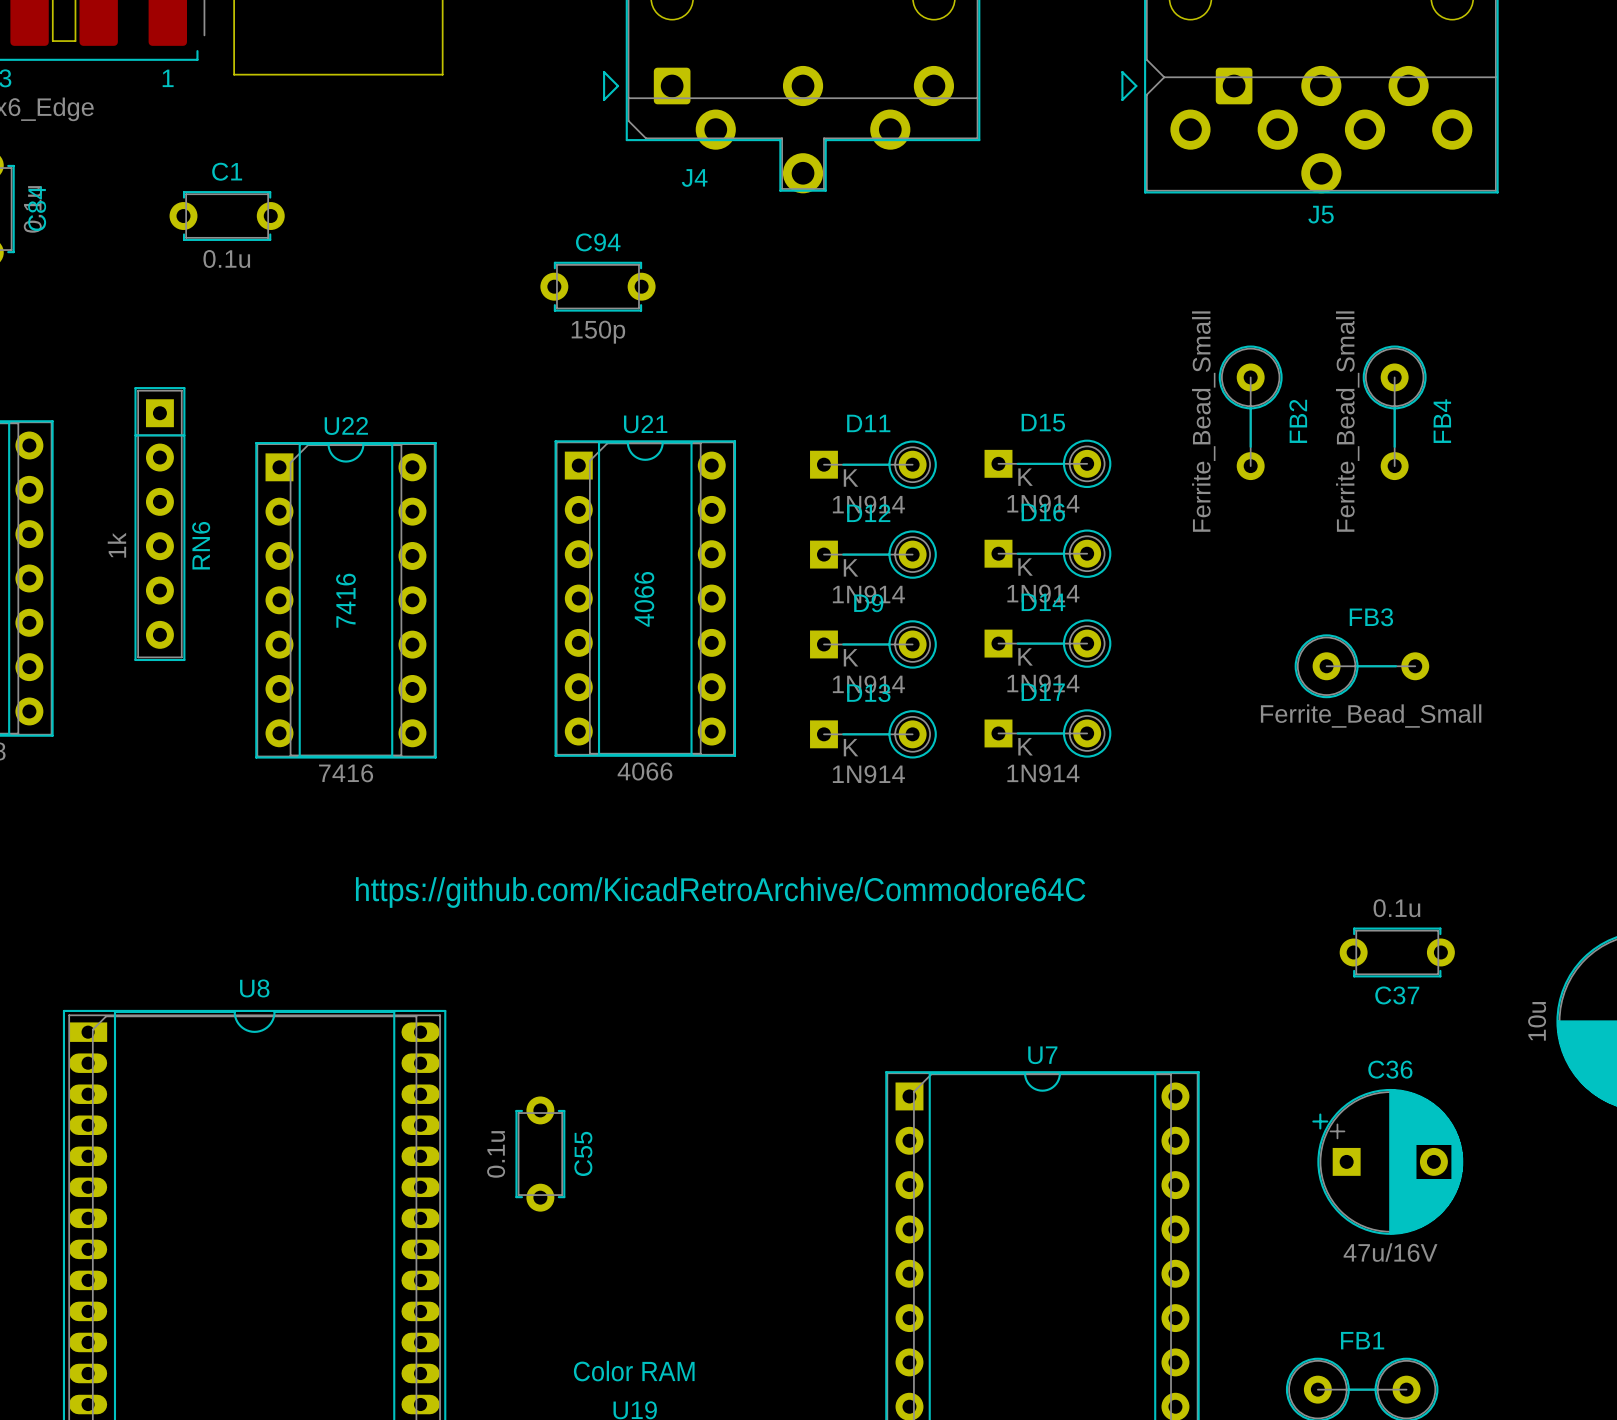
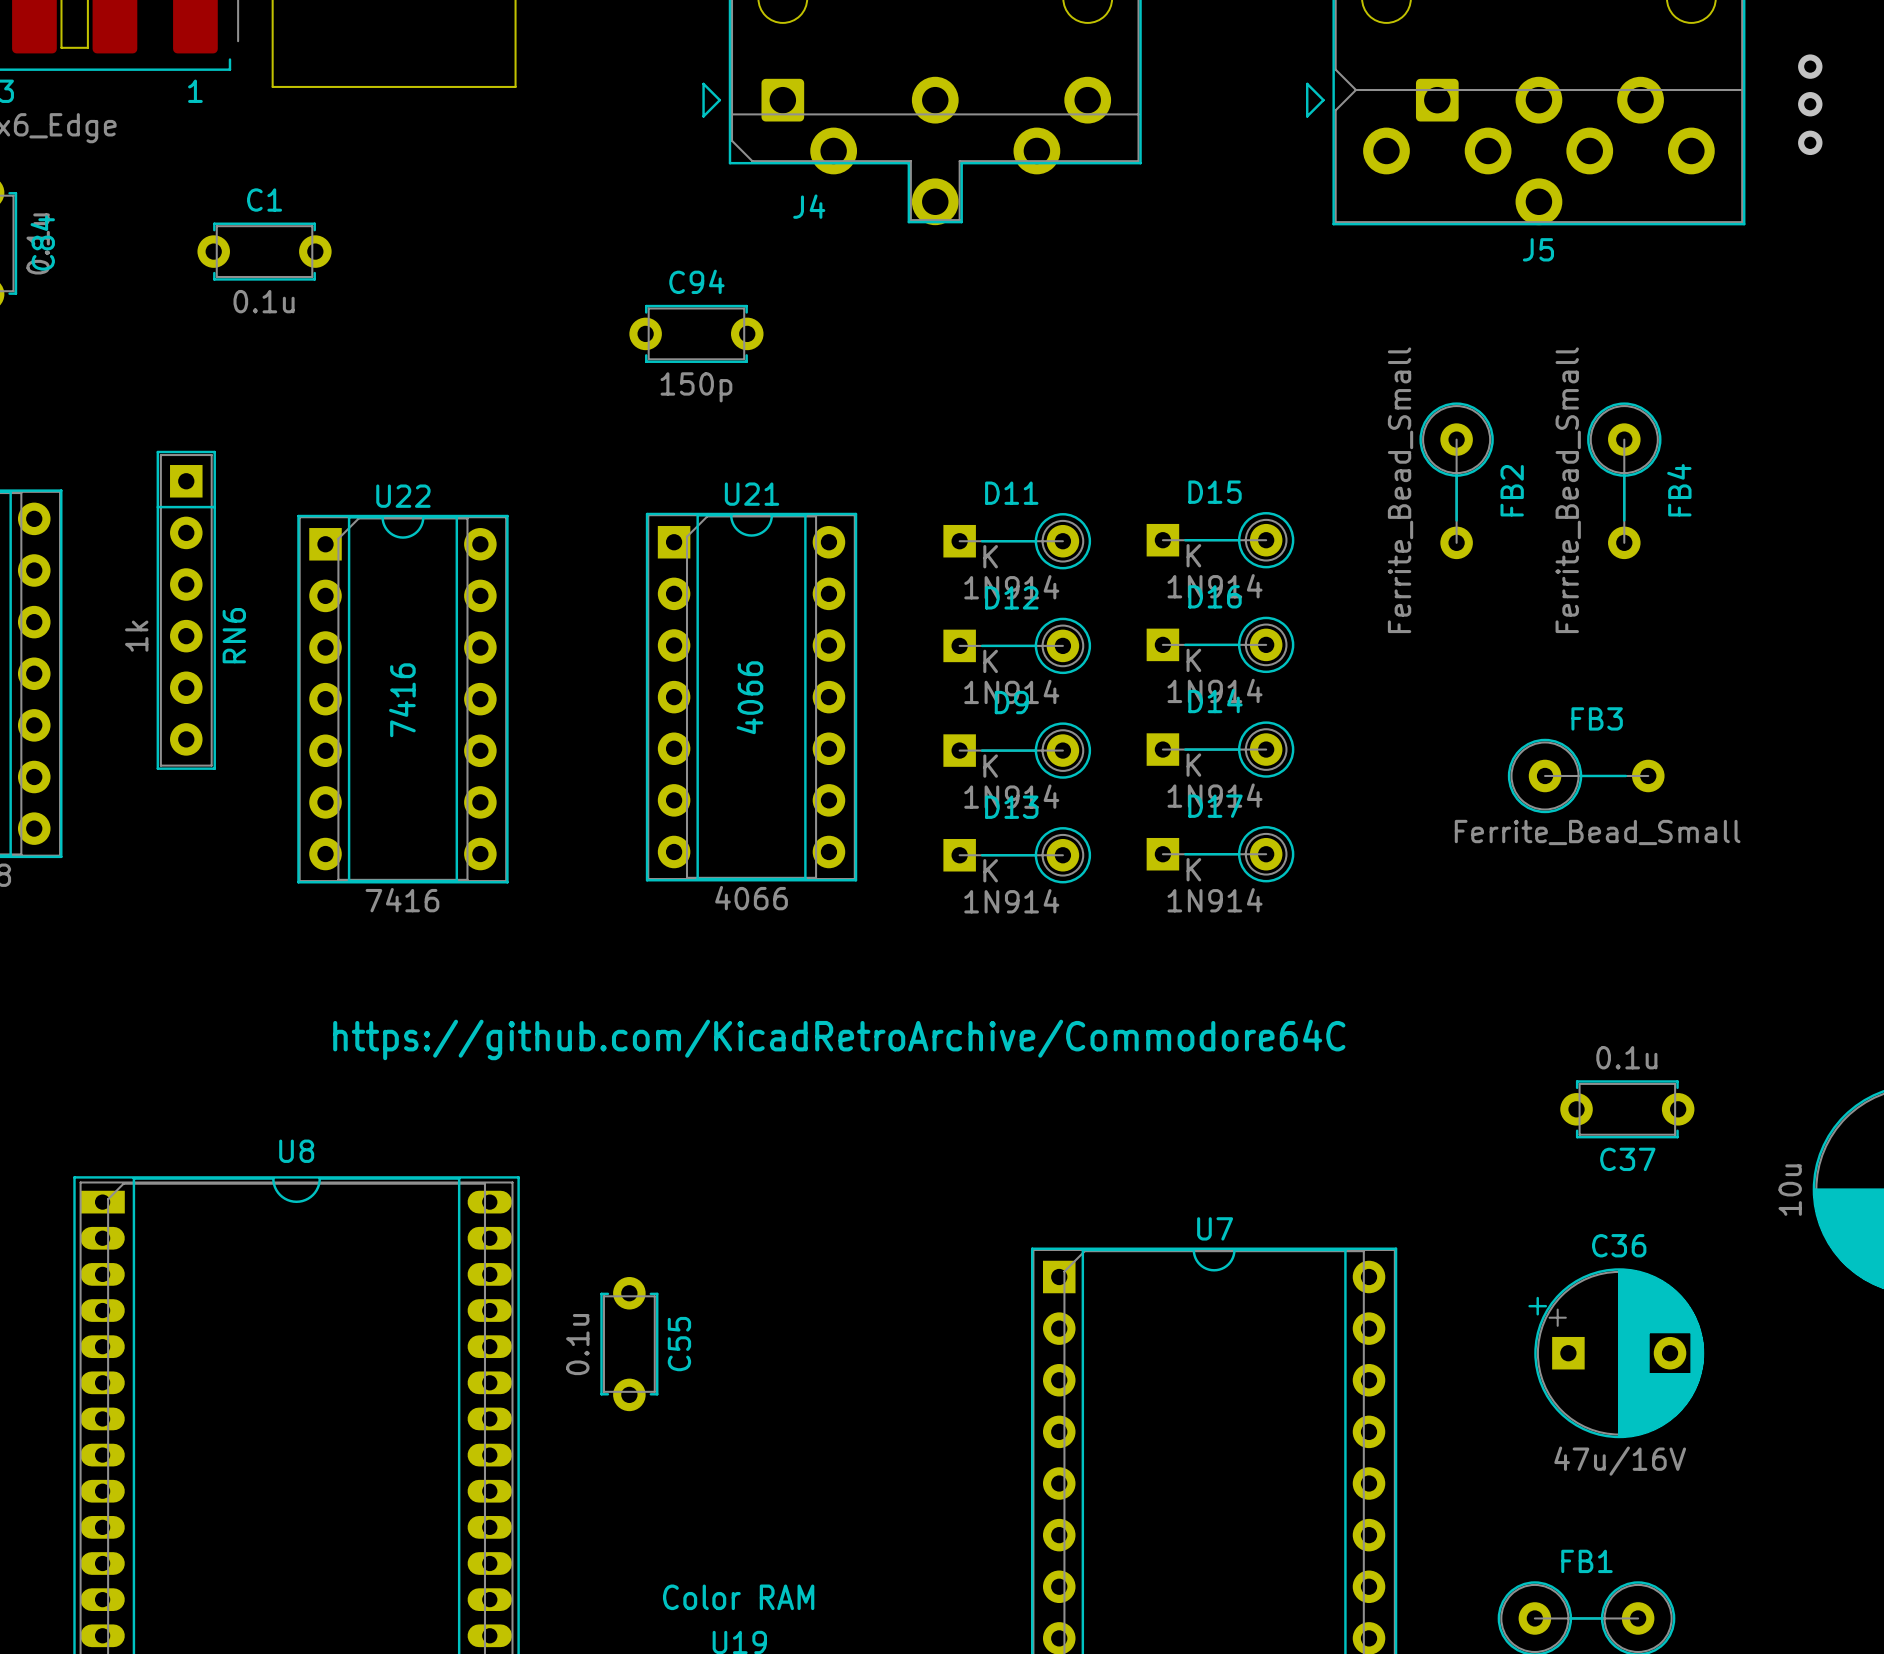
via: none -> (1810, 66)
via: none -> (1810, 104)
via: none -> (1810, 142)

